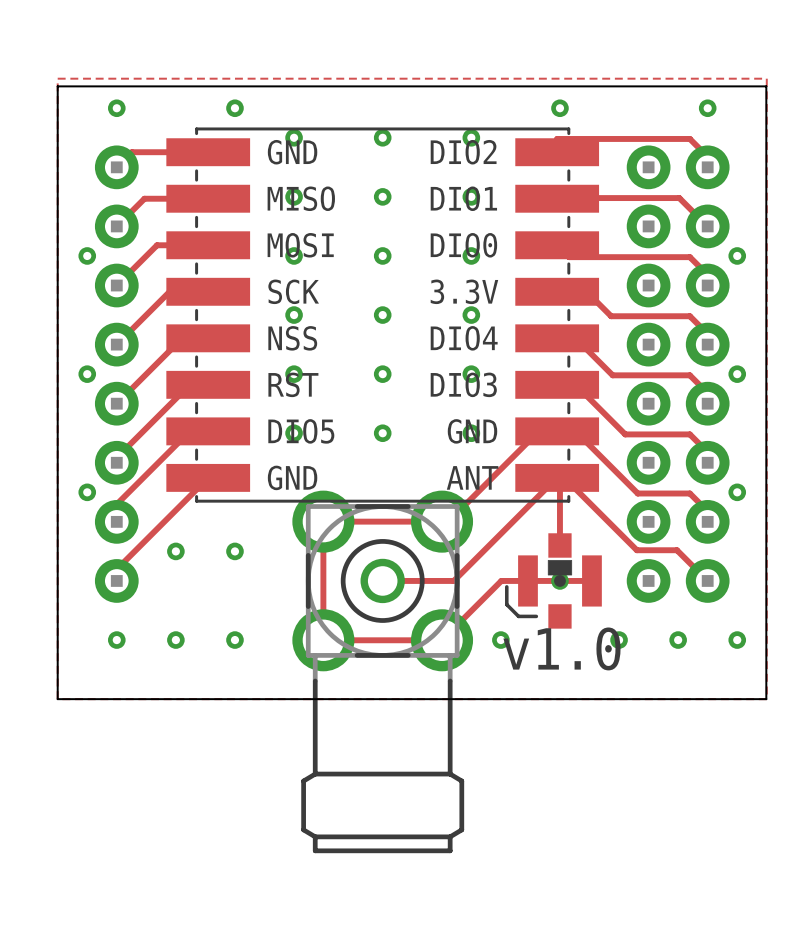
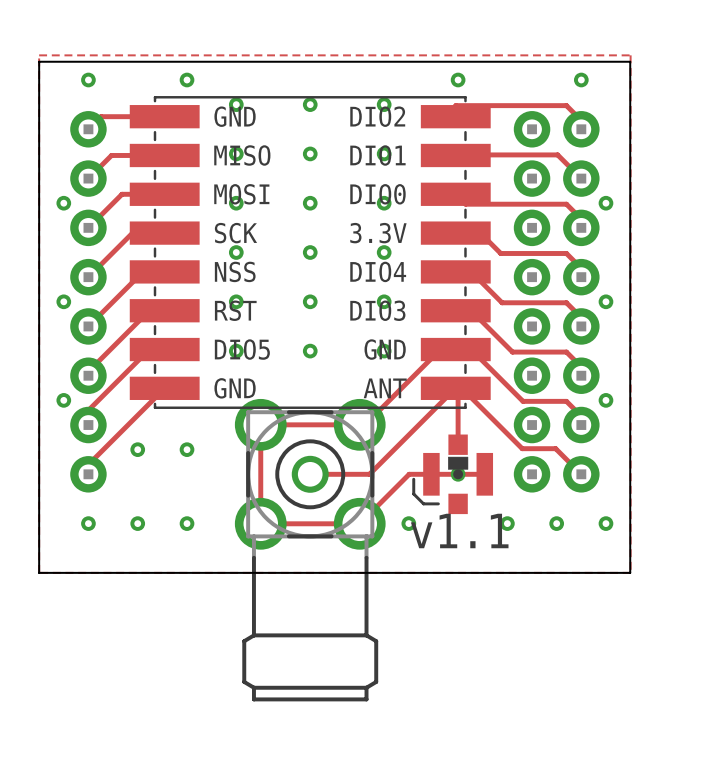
text: v1.0 (561, 648) -> v1.1 (459, 530)

